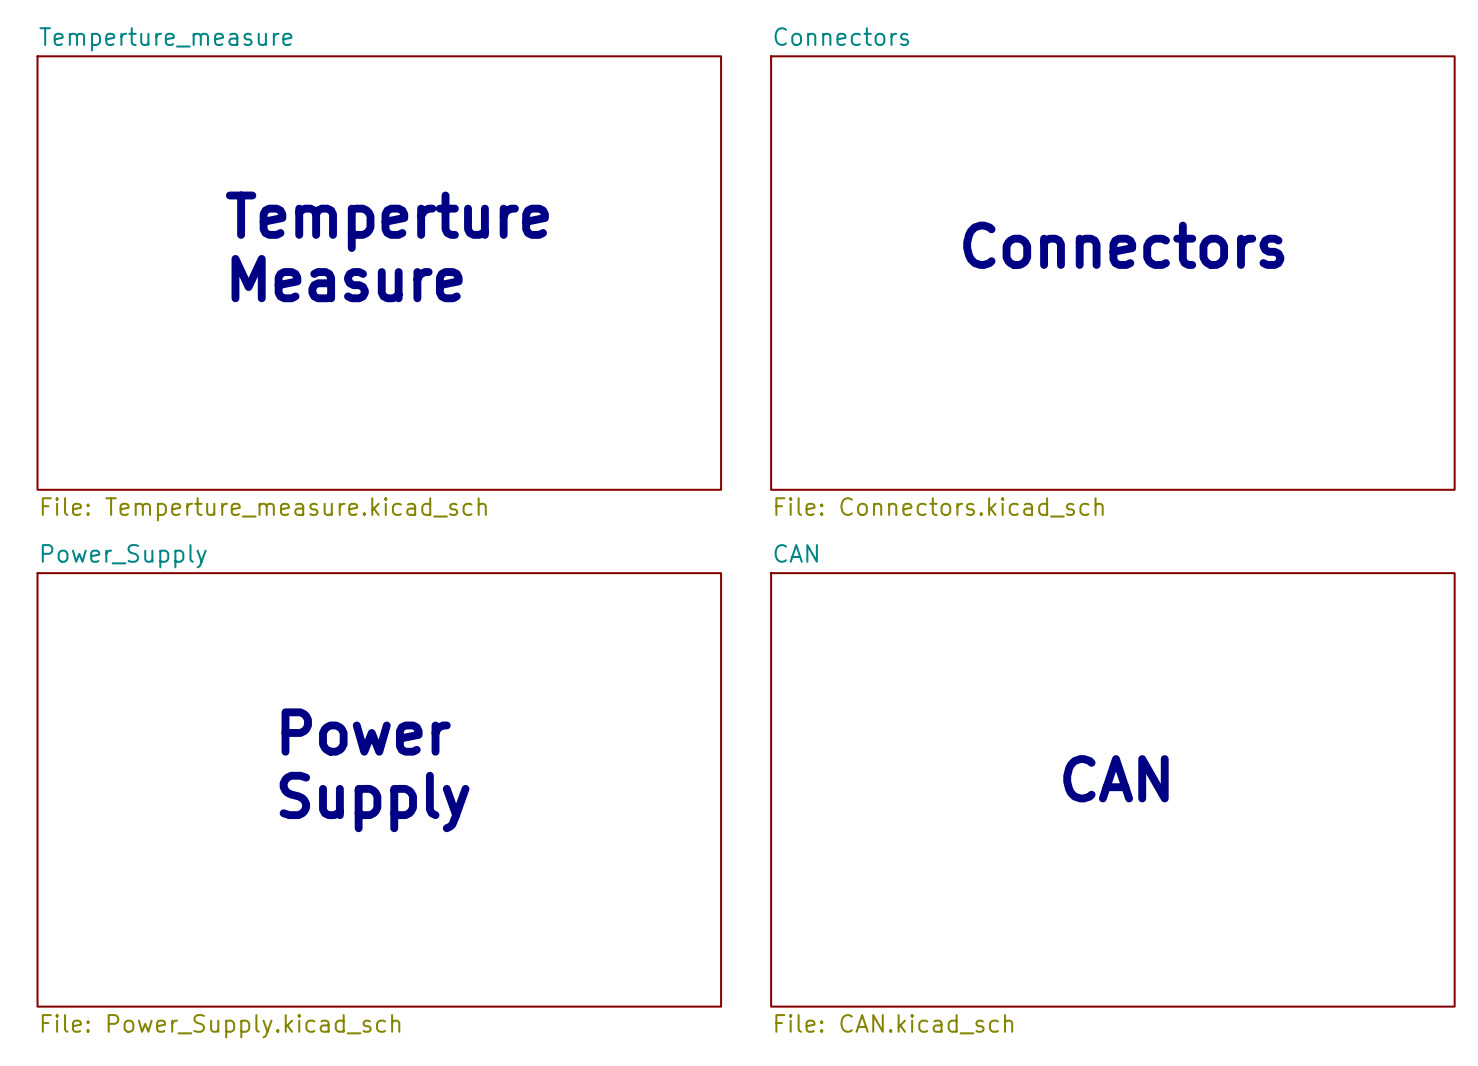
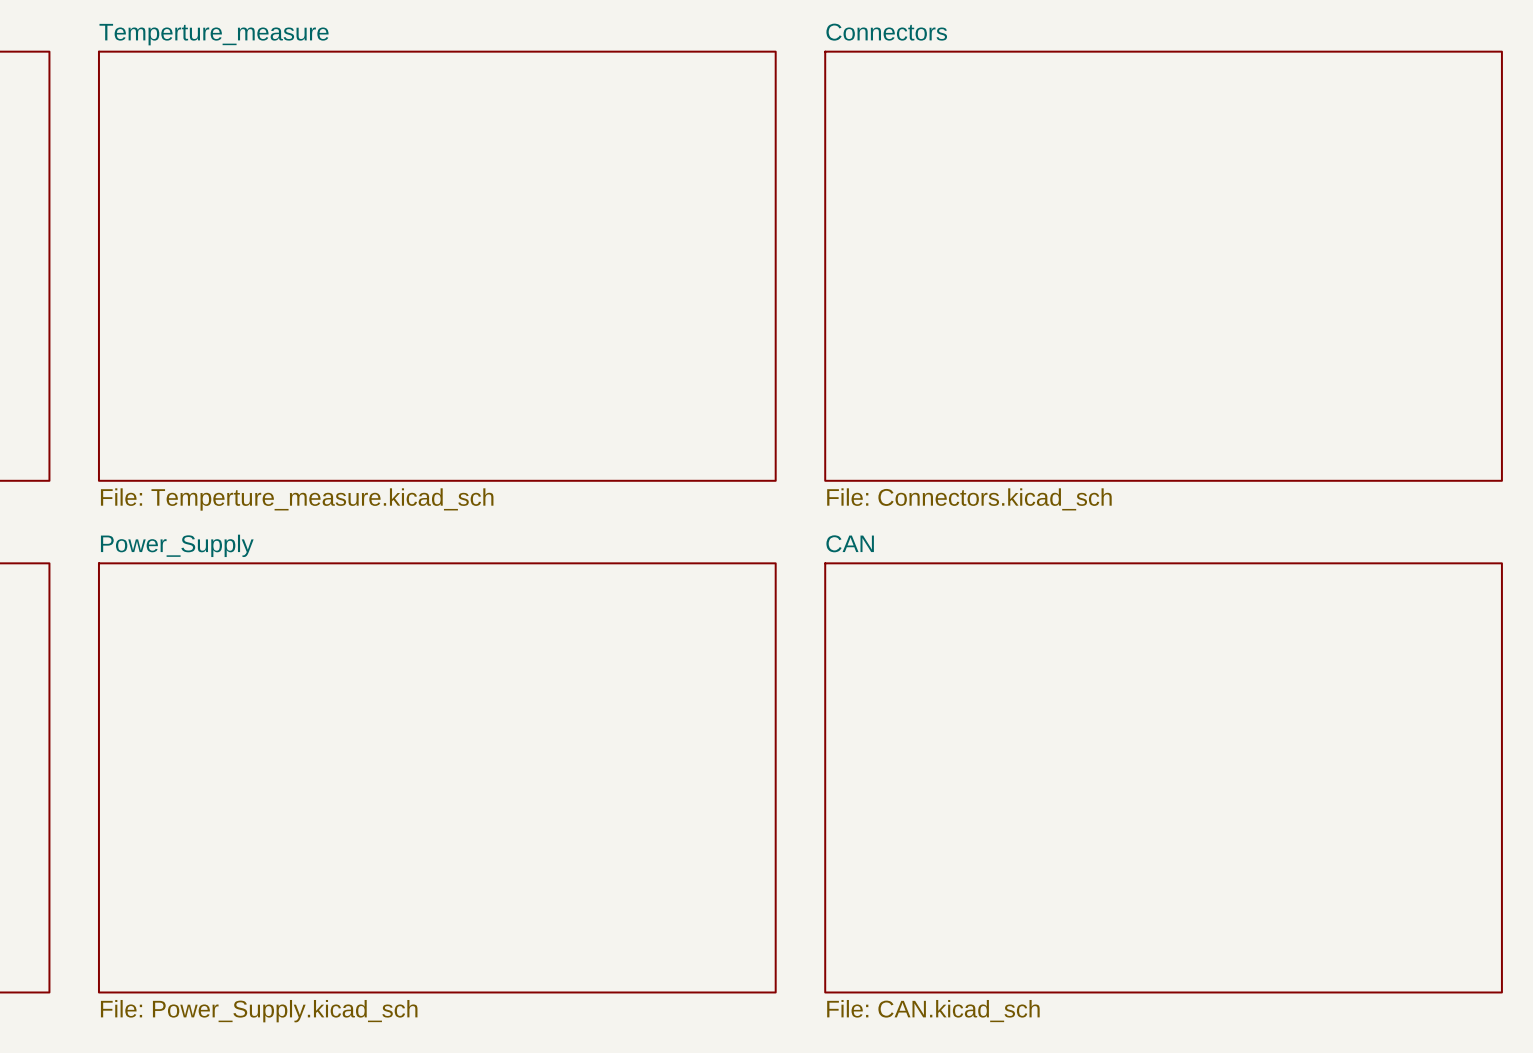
text: Temperture (387, 221) -> none
text: Connectors (1123, 245) -> none
text: Measure (347, 278) -> none
text: Power (366, 732) -> none
text: CAN (1115, 778) -> none
text: Supply (374, 802) -> none

